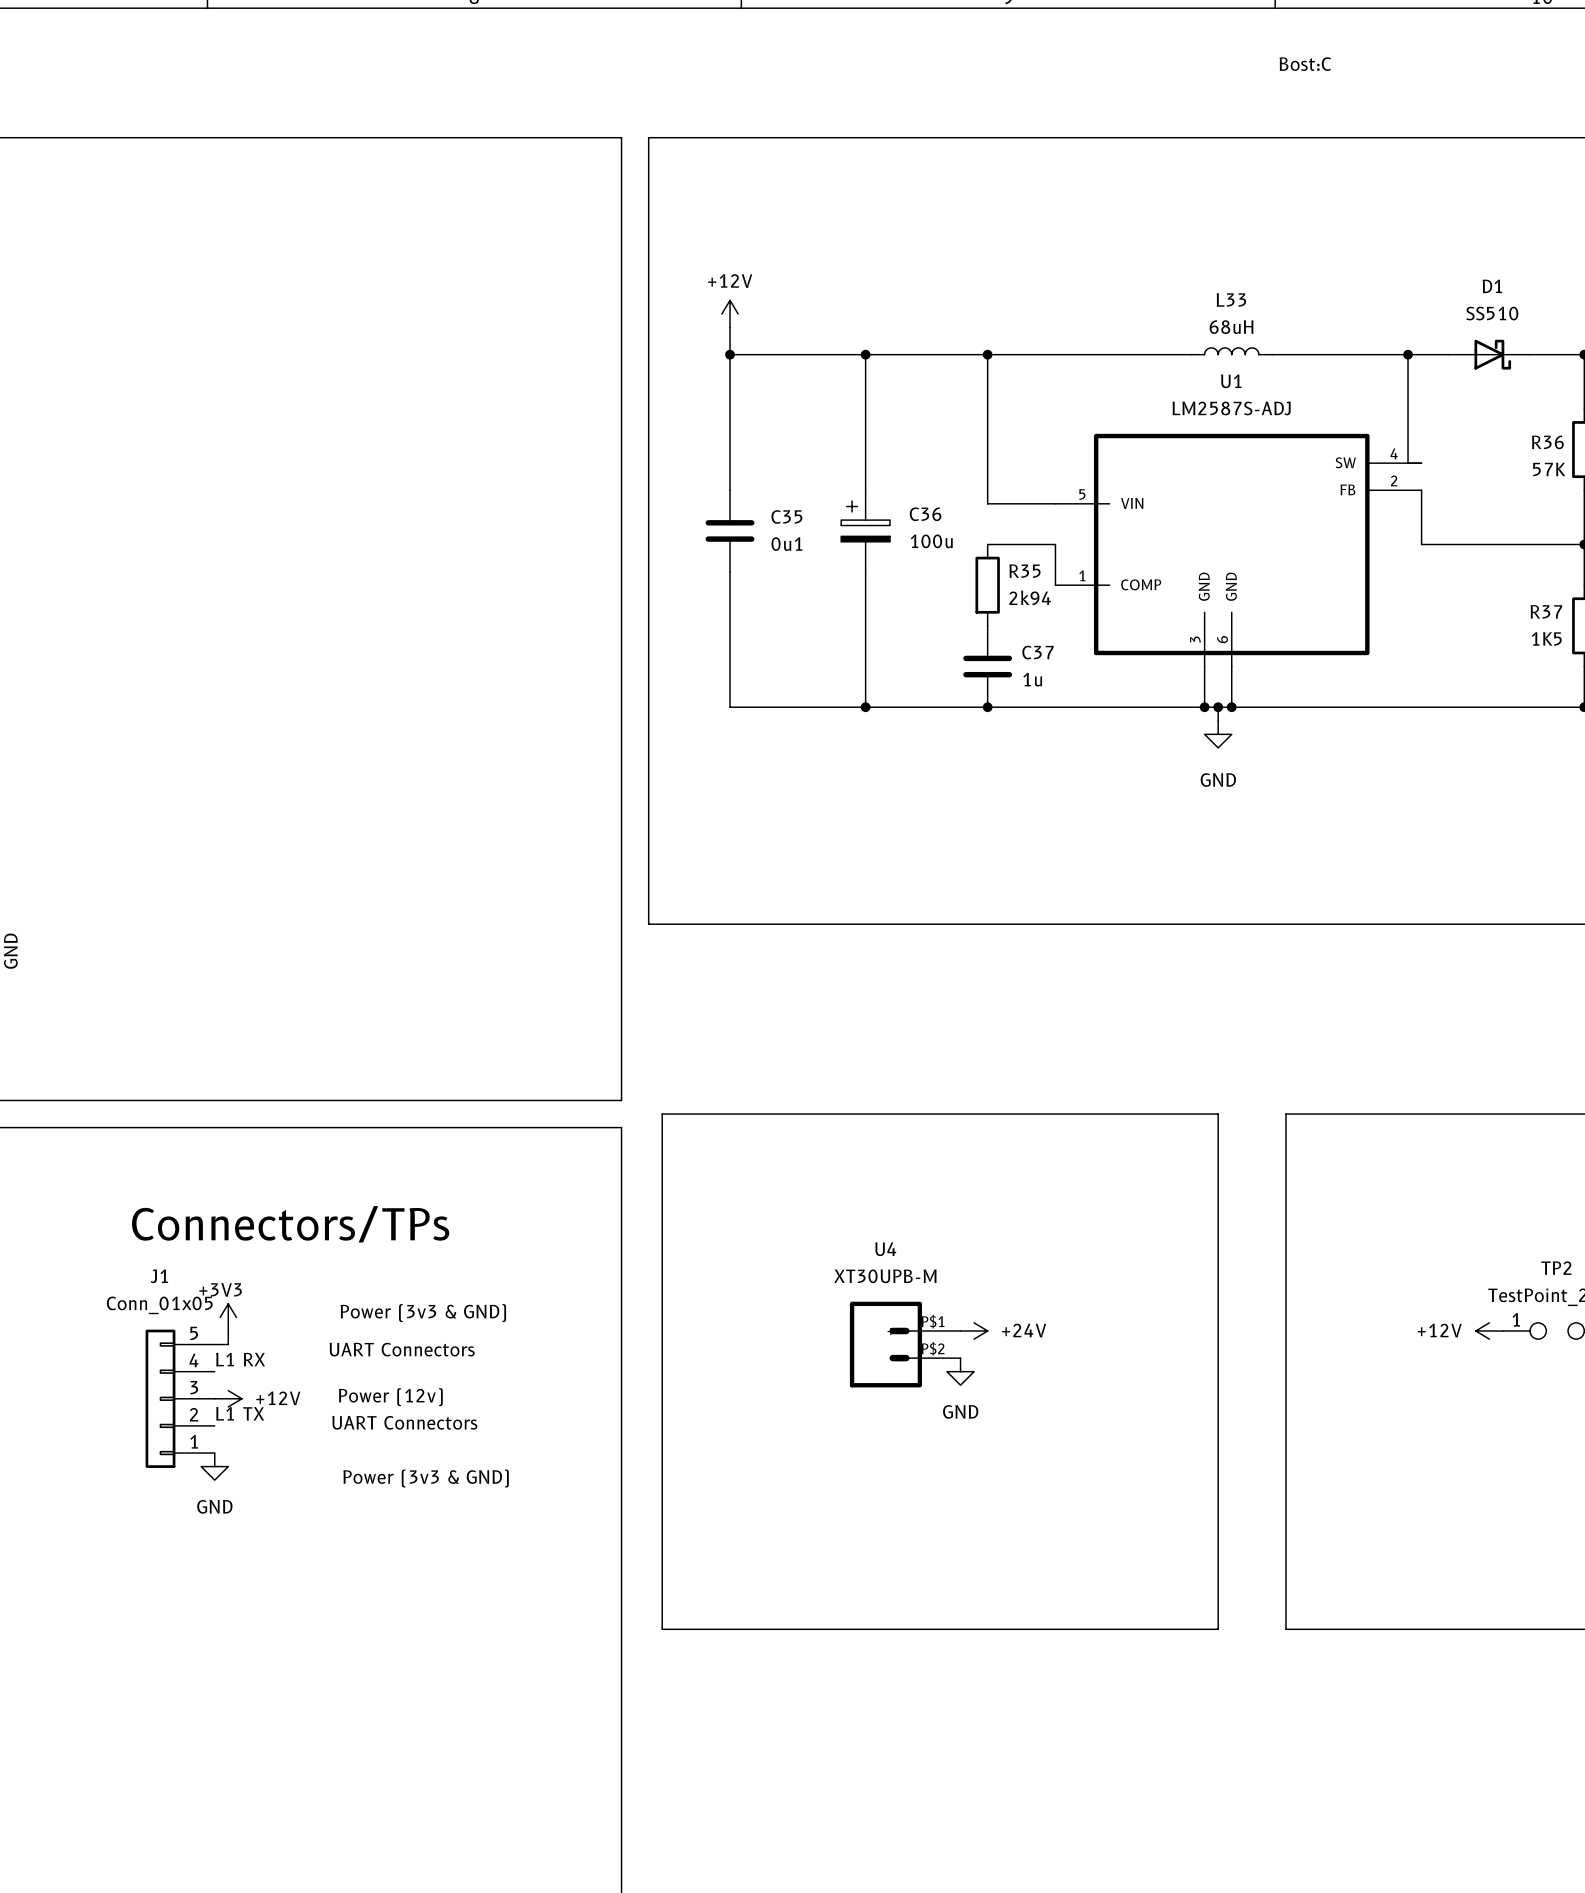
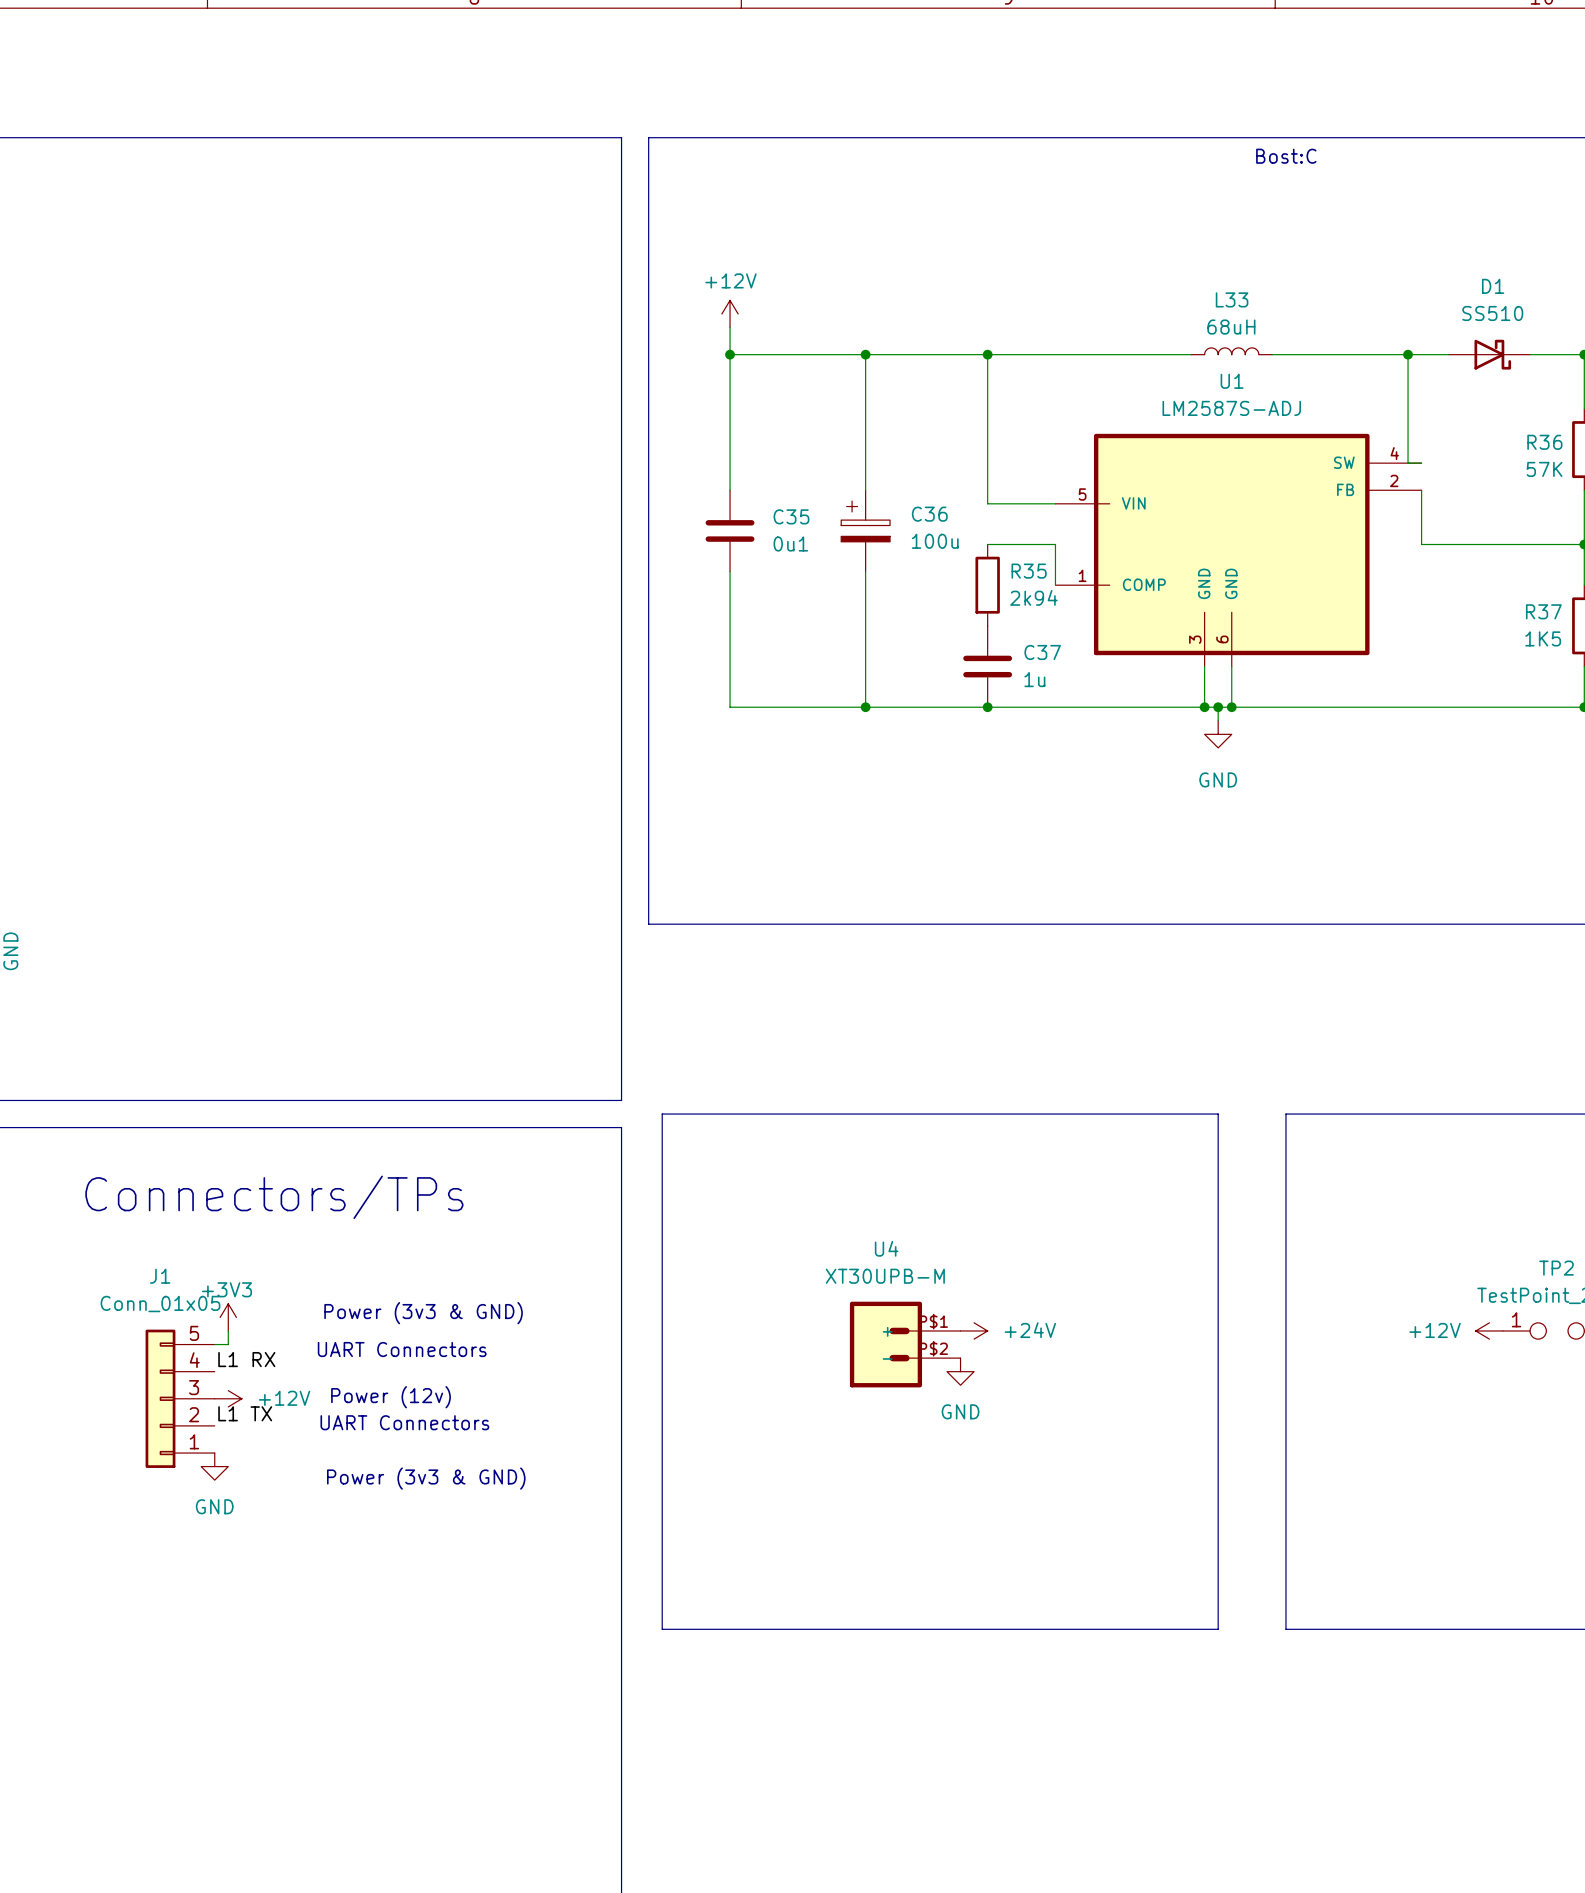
text position: Bost:C (1305, 64) -> Bost:C (1286, 156)
text position: Connectors/TPs (290, 1224) -> Connectors/TPs (274, 1197)

